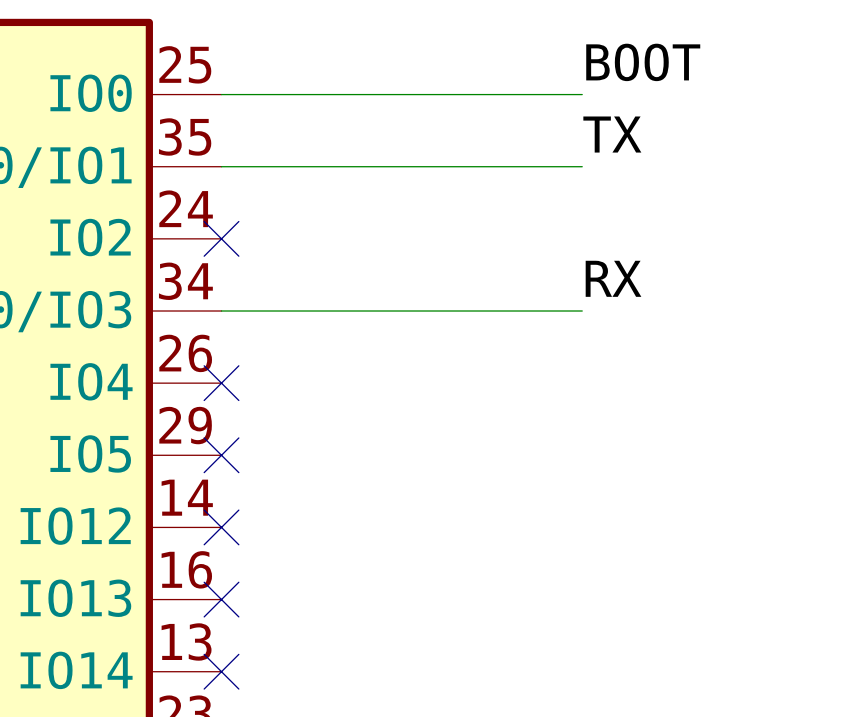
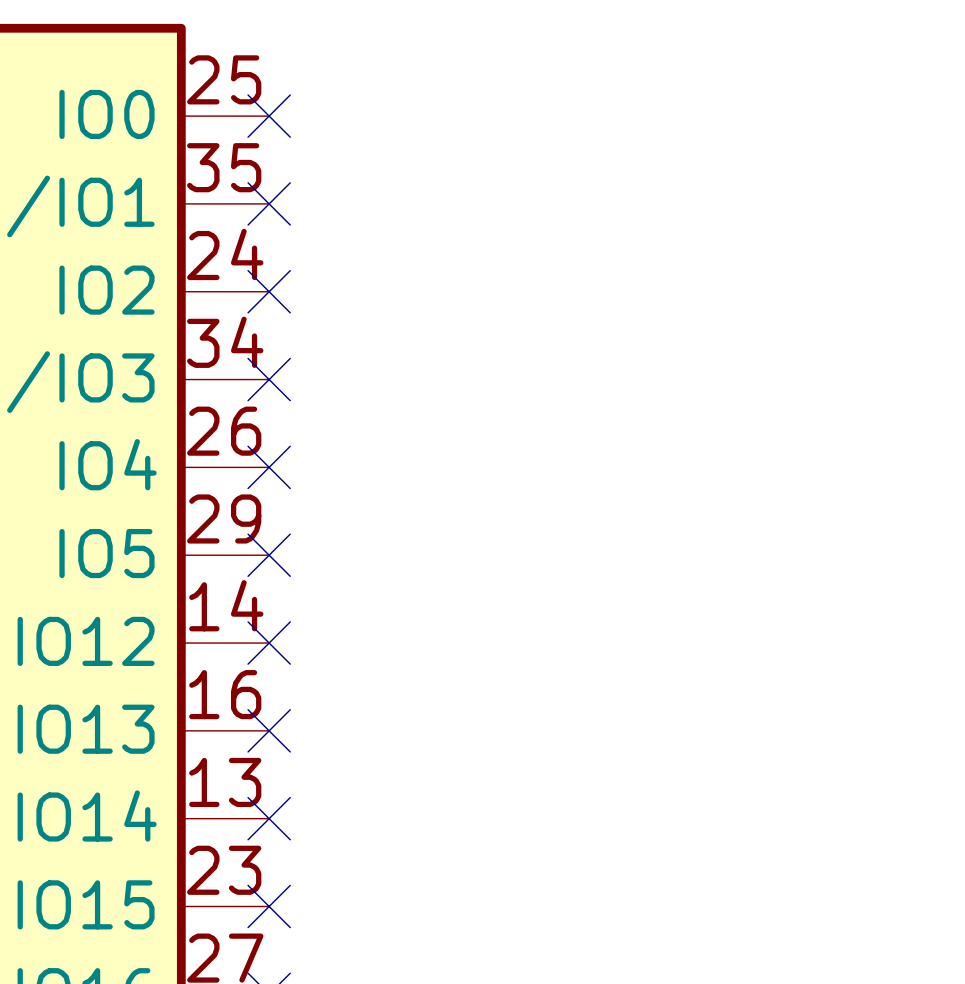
label: BOOT (643, 62) -> none
wire: (221, 94) (582, 94) -> none
no-connect mark: none -> (269, 116)
label: TX (612, 134) -> none
wire: (221, 166) (582, 166) -> none
no-connect mark: none -> (269, 203)
label: RX (613, 278) -> none
wire: (221, 311) (582, 311) -> none
no-connect mark: none -> (269, 379)

